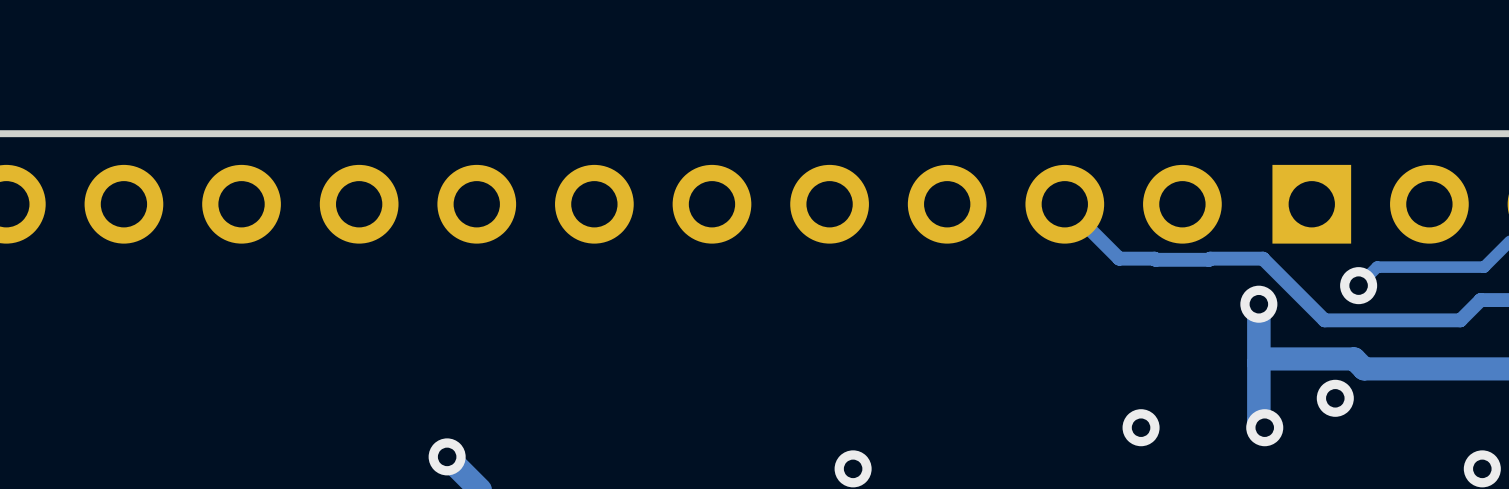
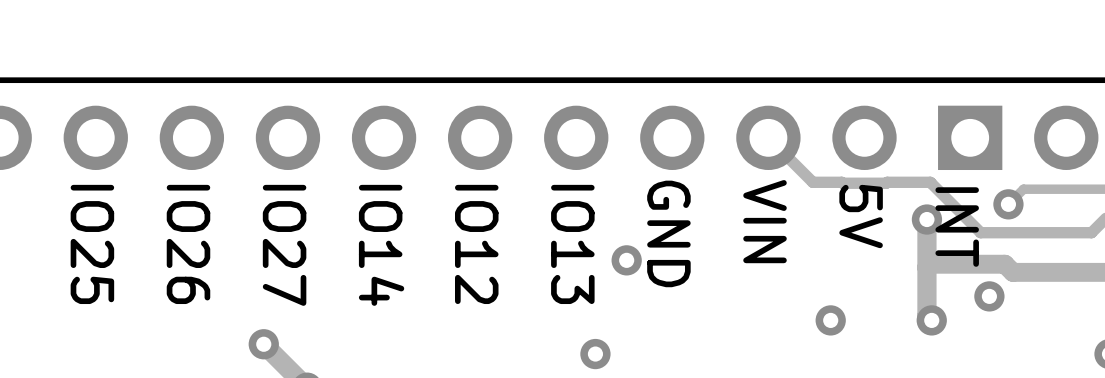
text: none -> 5V (861, 216)
text: none -> VIN (765, 221)
text: none -> INT (957, 227)
text: none -> GND (668, 233)
text: none -> IO25 (92, 244)
text: none -> IO26 (188, 244)
text: none -> IO12 (476, 244)
text: none -> IO13 (572, 244)
text: none -> IO27 (284, 245)
text: none -> IO14 (381, 245)
via: none -> (626, 260)

